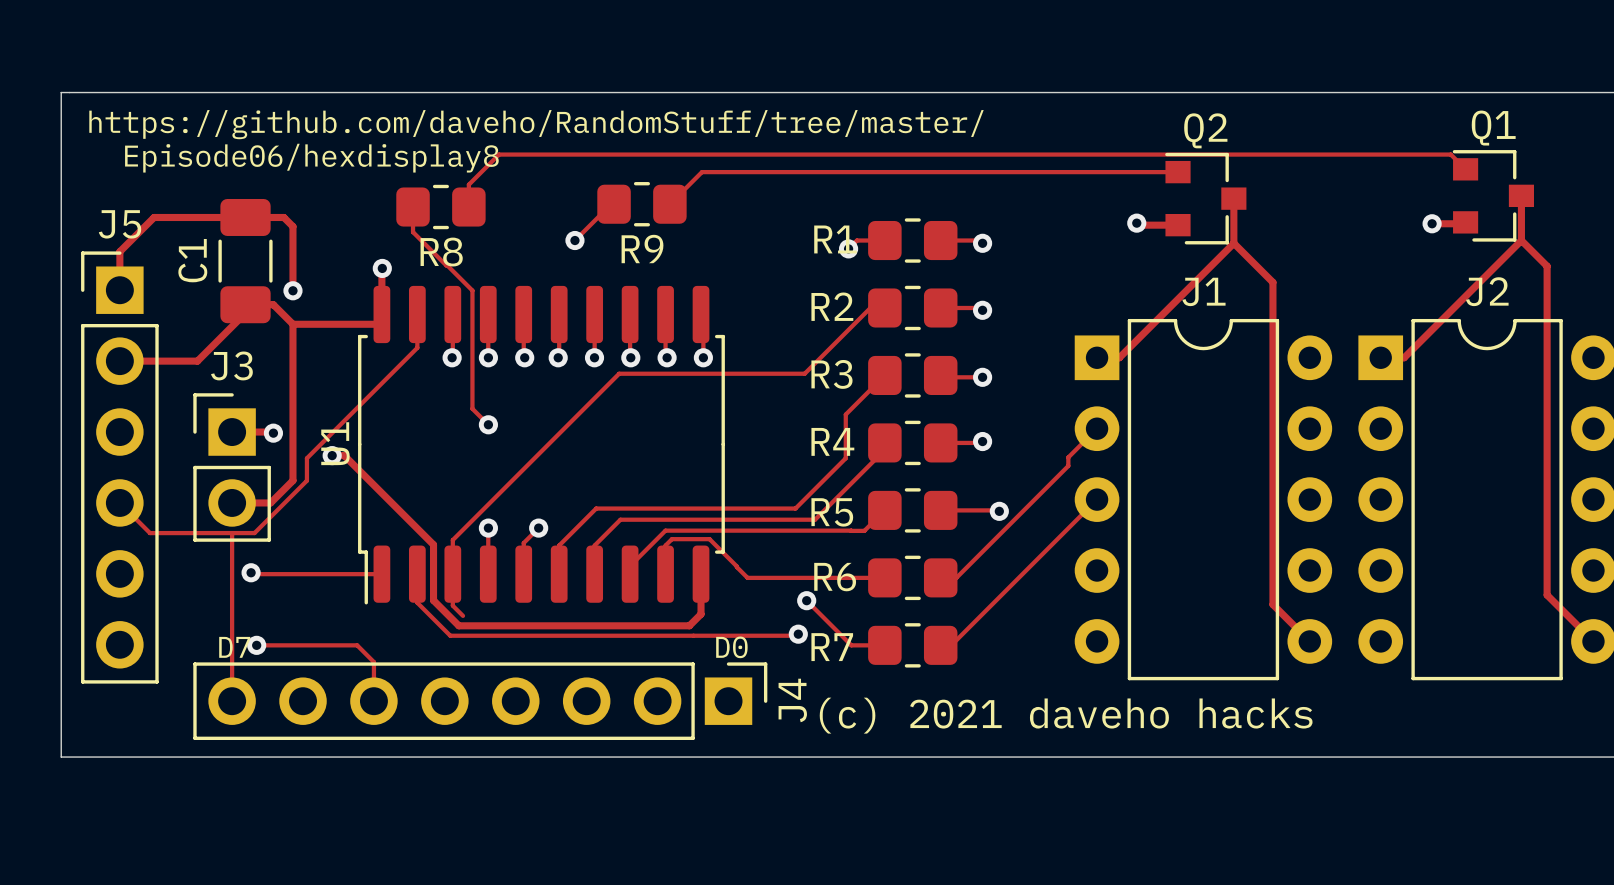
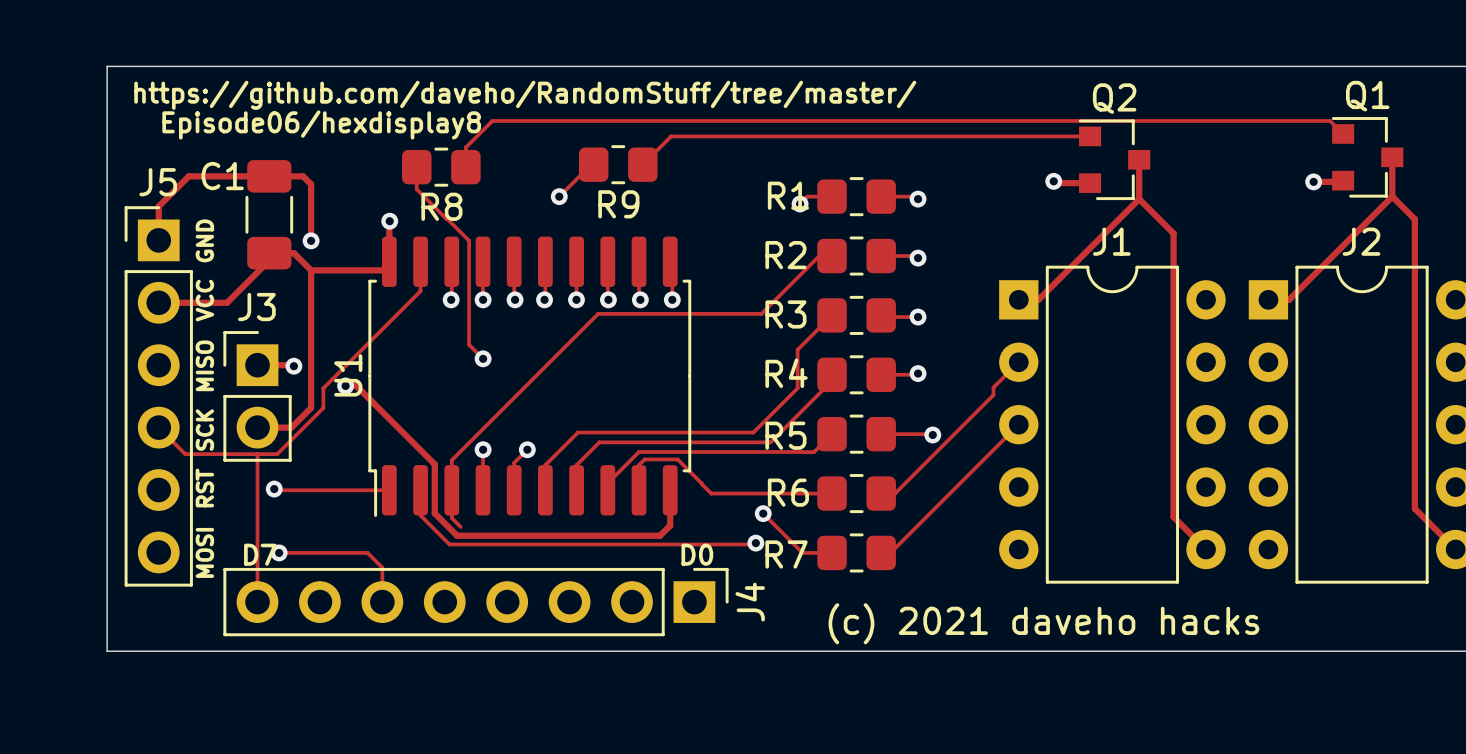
C1 name rotation: 0° (192, 260) -> 90° clockwise (222, 176)
text: none -> GND (204, 240)
text: none -> VCC (204, 300)
text: none -> MISO (204, 365)
text: none -> SCK (204, 430)
text: none -> RST (204, 488)
text: none -> MOSI (204, 552)
text position: (c) 2021 daveho hacks (1066, 715) -> (c) 2021 daveho hacks (1043, 623)

